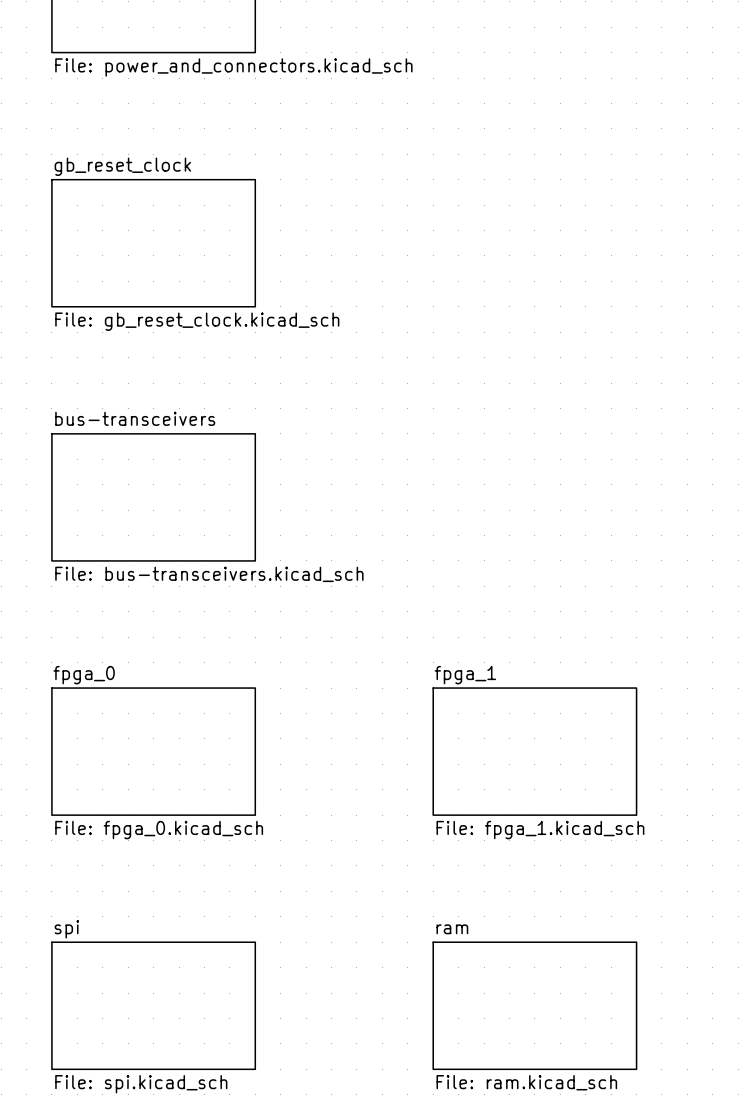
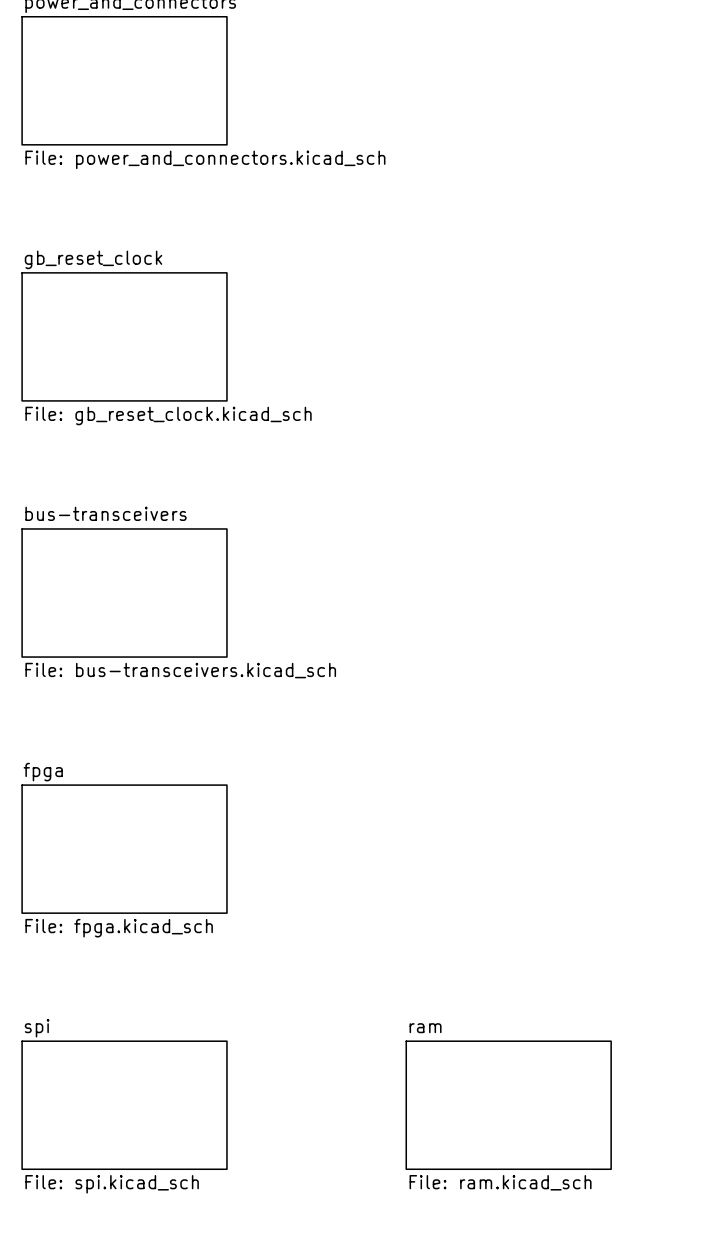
sheet fpga_0 name: fpga_0 (84, 675) -> fpga (43, 772)
sheet fpga_1: File: fpga_1.kicad_sch (534, 751) -> none
sheet fpga_0 value: File: fpga_0.kicad_sch (159, 830) -> File: fpga.kicad_sch (119, 928)

